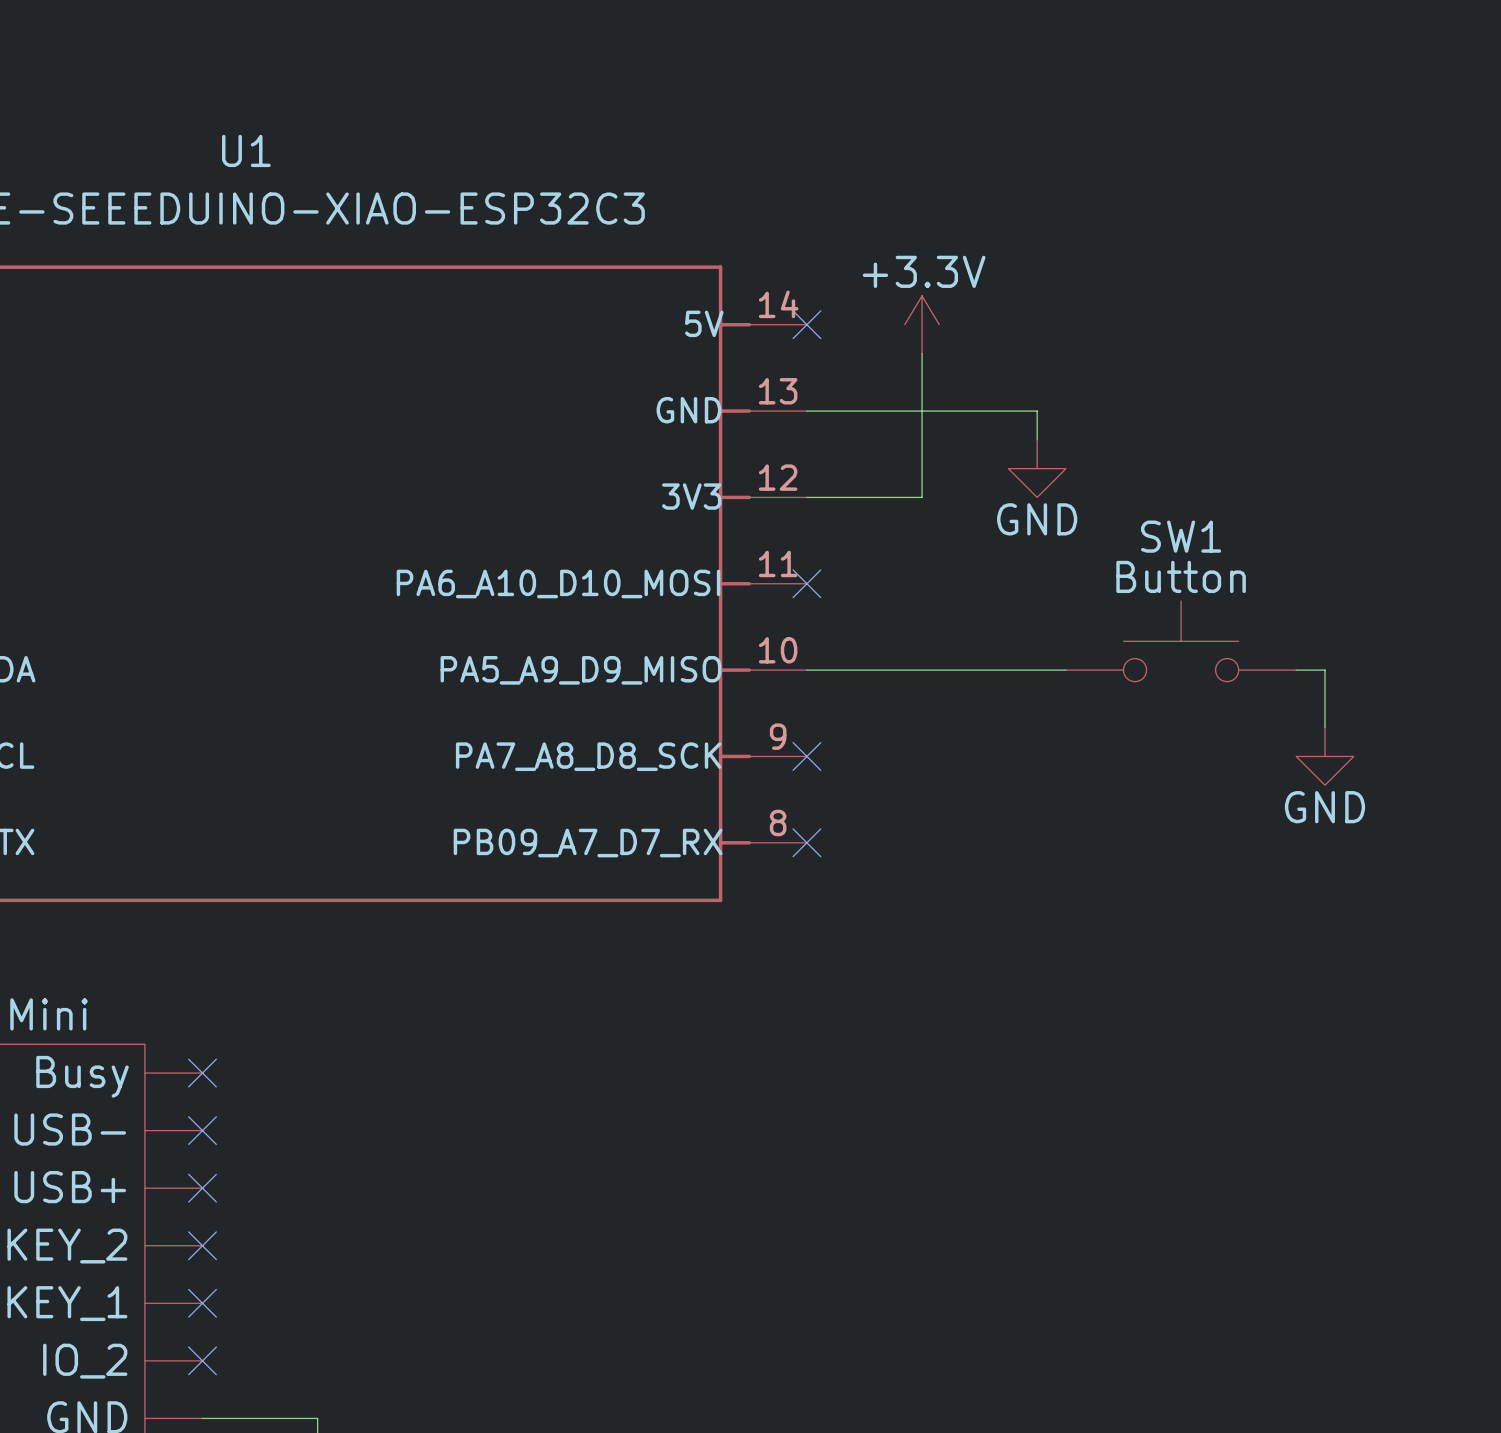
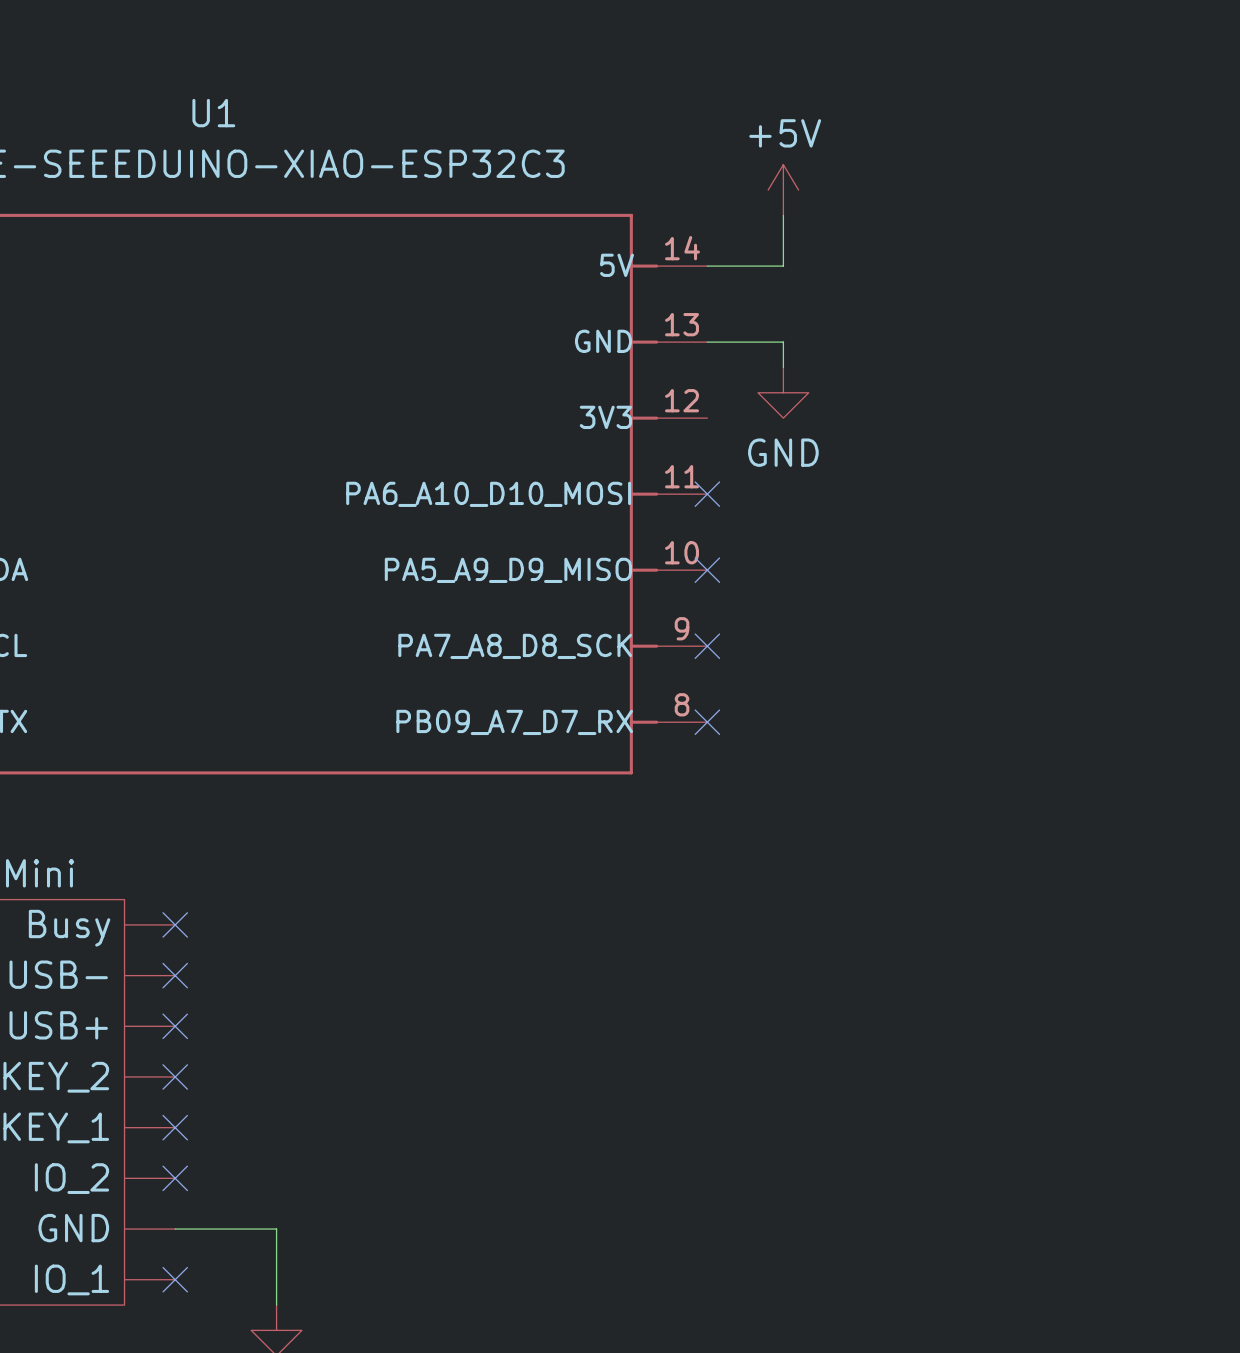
power symbol: none -> +5V (783, 190)
wire: none -> (783, 215) (783, 266) (707, 266)
no-connect mark: (806, 324) -> none
power symbol: +3.3V (922, 324) -> none
wire: (922, 353) (922, 497) (806, 497) -> none
wire: (893, 411) (1037, 411) (1037, 439) -> (783, 342) (783, 367)
power symbol position: GND (1037, 468) -> GND (783, 392)
power symbol text position: GND (1037, 519) -> GND (783, 452)
SW1: Button (1181, 641) -> none
wire: (806, 670) (1065, 670) -> none
no-connect mark: none -> (707, 570)
wire: (1296, 670) (1324, 670) (1324, 727) -> none
power symbol: GND (1324, 756) -> none

